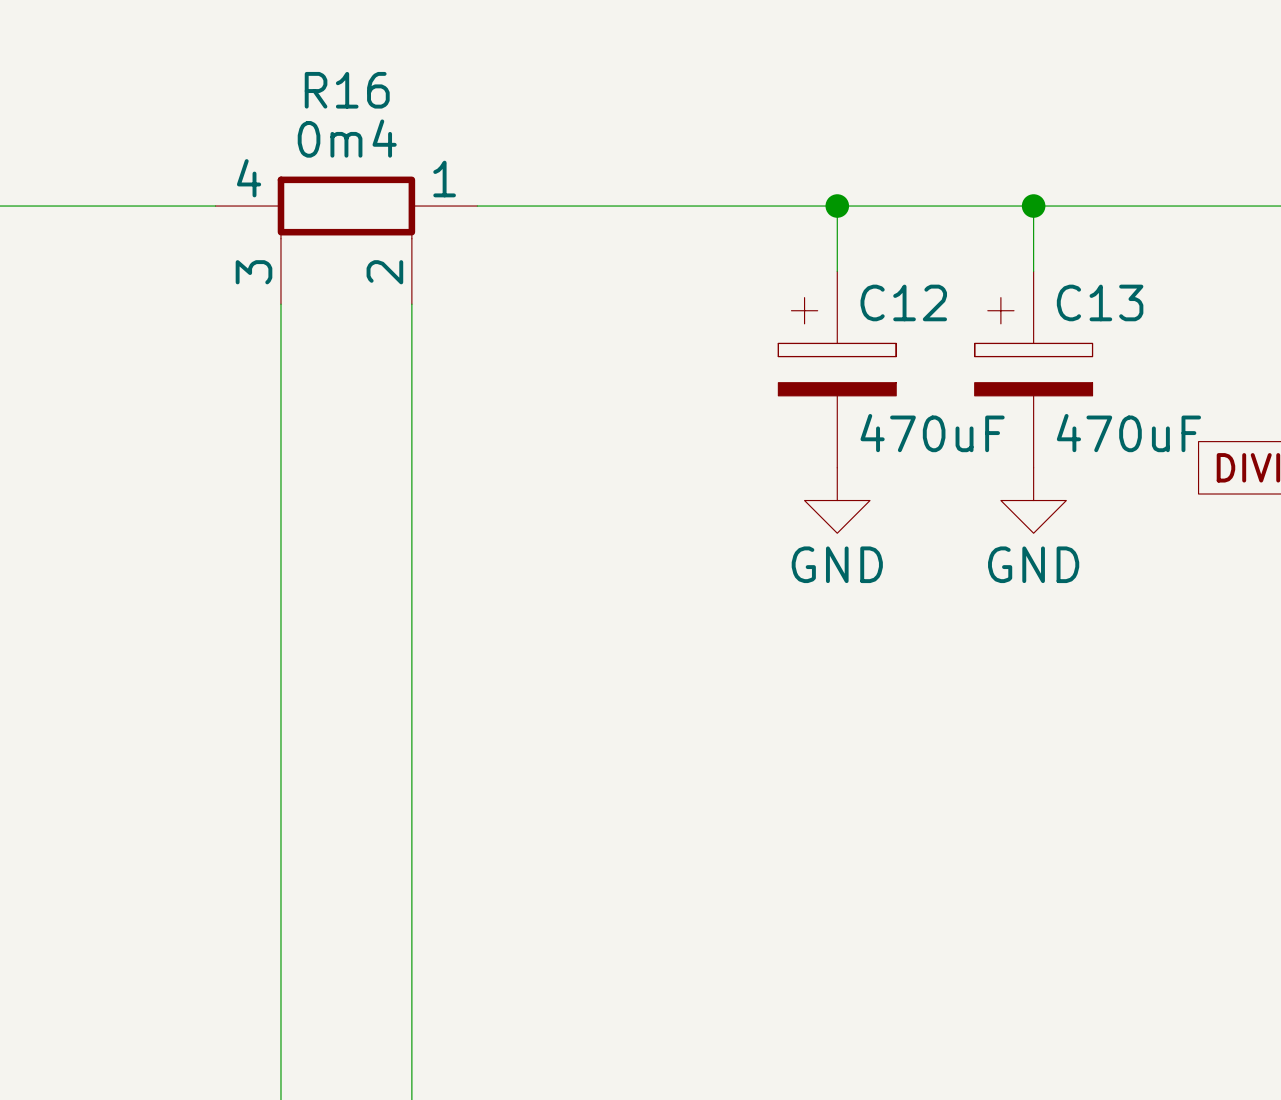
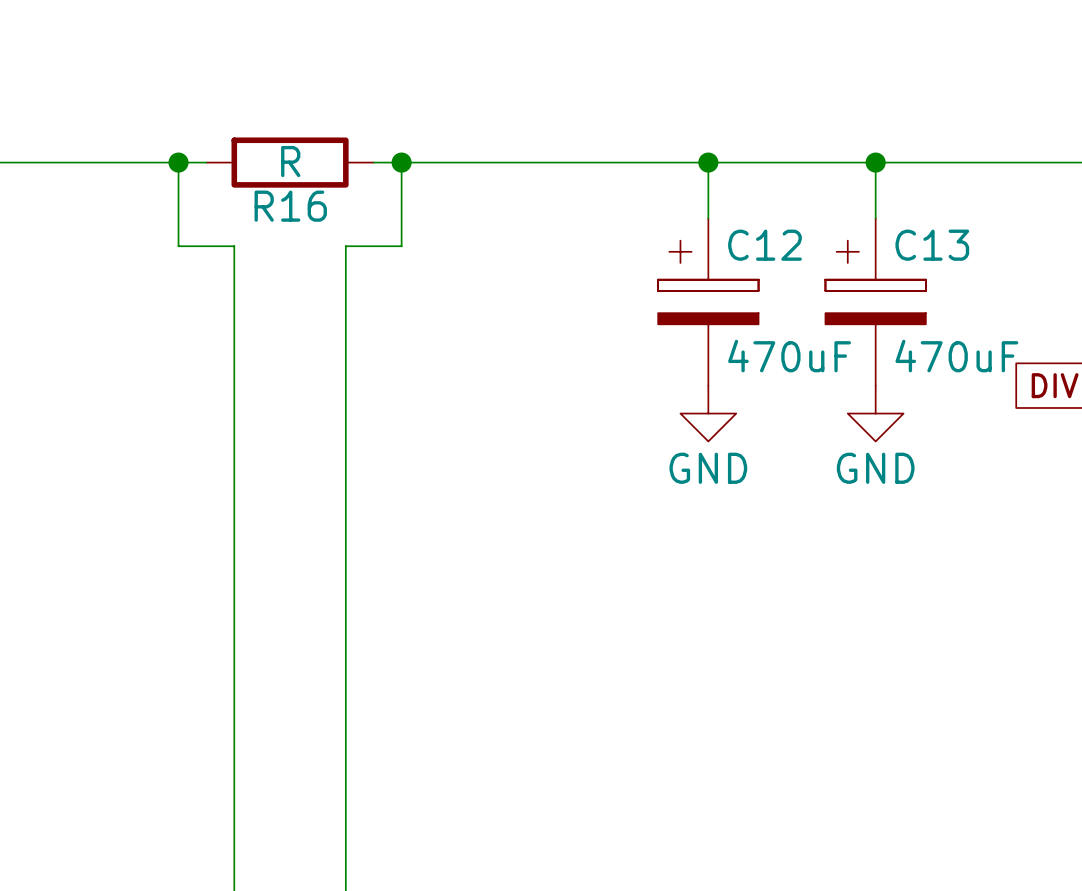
R16 name position: R16 (347, 90) -> R16 (290, 206)
R16 value: 0m4 (347, 138) -> R (290, 161)
R16 symbol: [215, 176, 478, 305] -> [206, 137, 374, 188]
junction: none -> (178, 162)
wire: none -> (206, 162) (178, 162) (178, 246) (234, 246)
wire: none -> (373, 162) (401, 162) (401, 246) (345, 246)
junction: none -> (401, 162)

